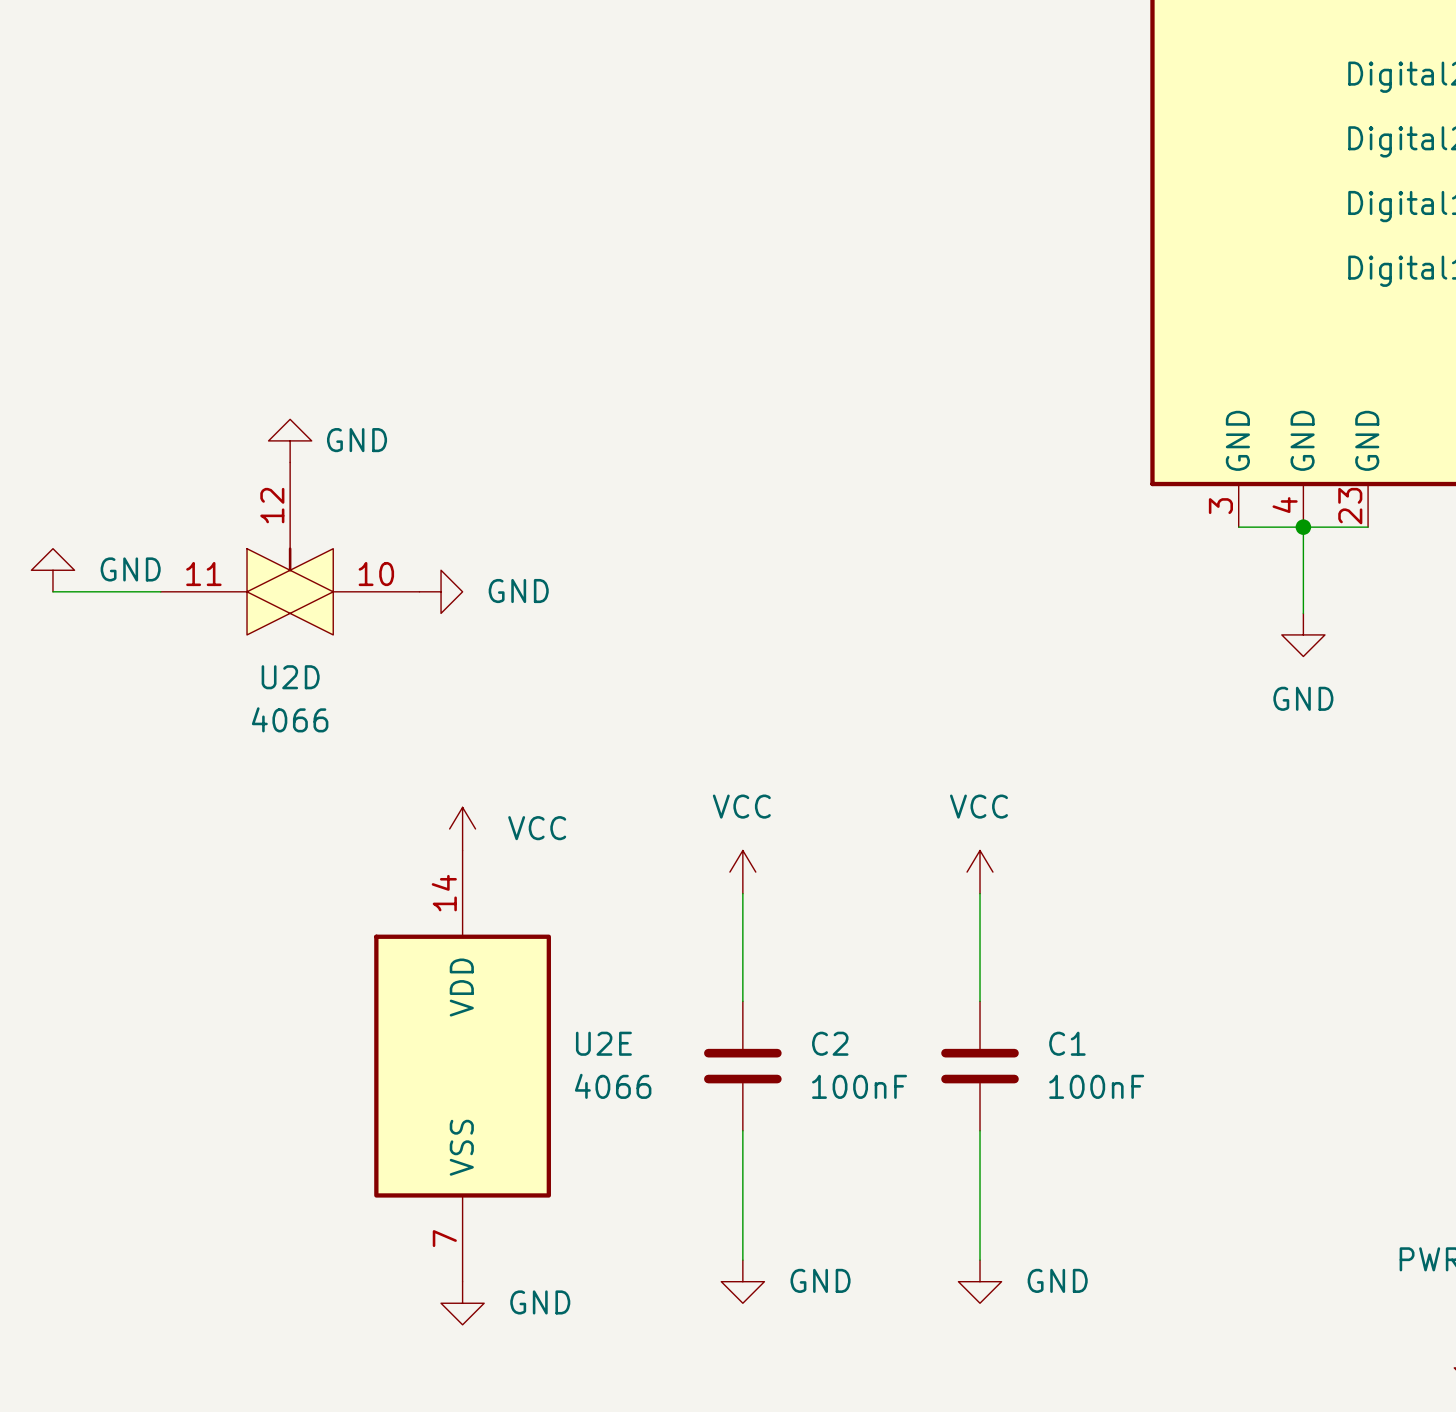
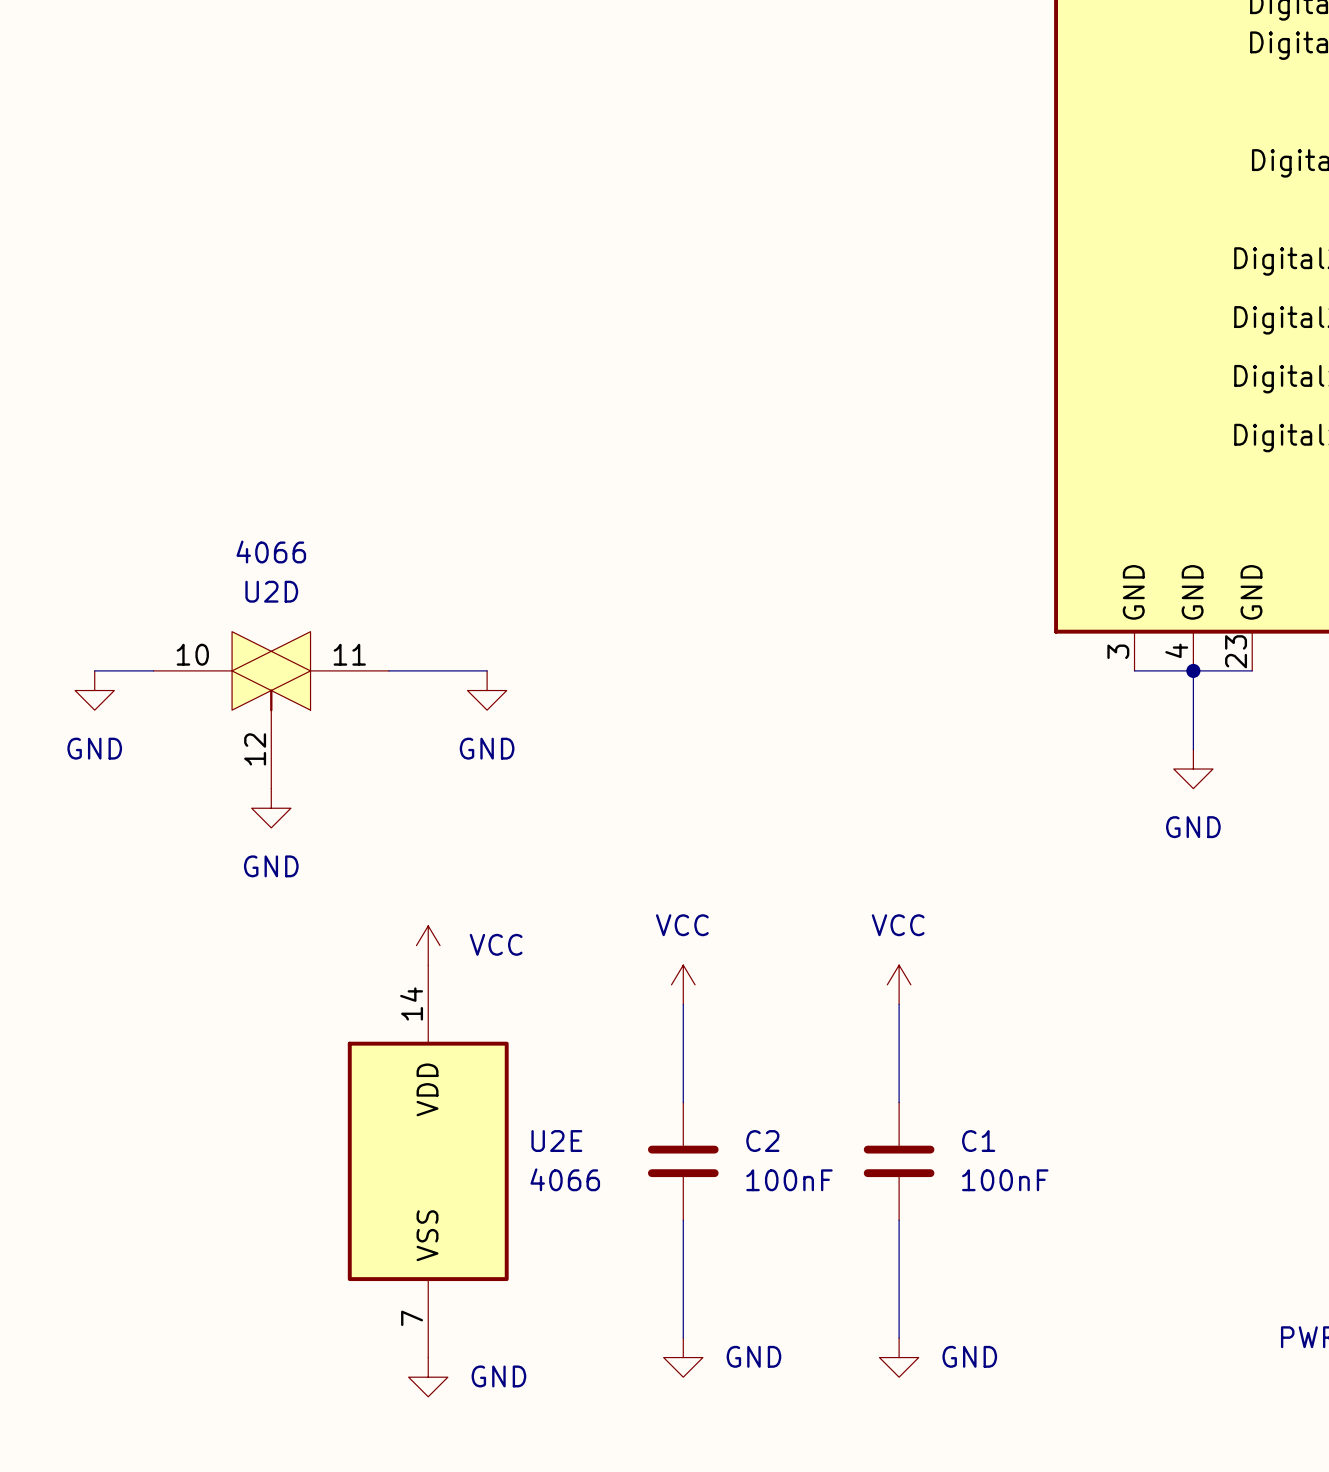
power symbol: GND (290, 440) -> none
wire: none -> (94, 670) (153, 670)
power symbol: none -> GND (487, 690)
power symbol text position: GND (130, 569) -> GND (94, 748)
power symbol rotation: 0° (52, 570) -> 180° (94, 690)
power symbol position: GND (52, 570) -> GND (94, 690)
wire: (52, 591) (160, 591) -> (389, 670) (487, 670)
U2D rotation: 0° (290, 591) -> 180° (271, 671)
power symbol: GND (441, 591) -> none
power symbol: none -> GND (271, 808)

